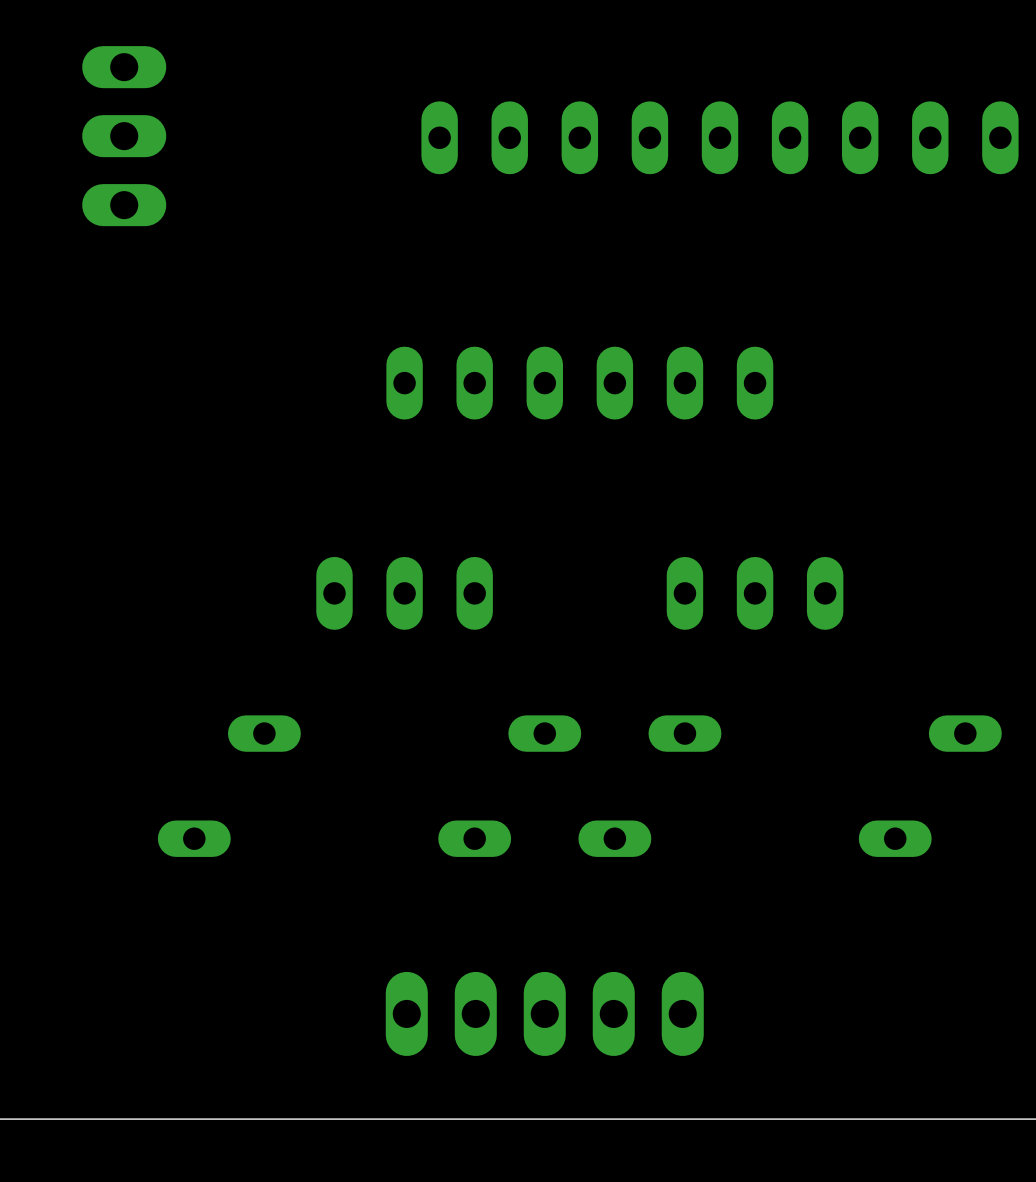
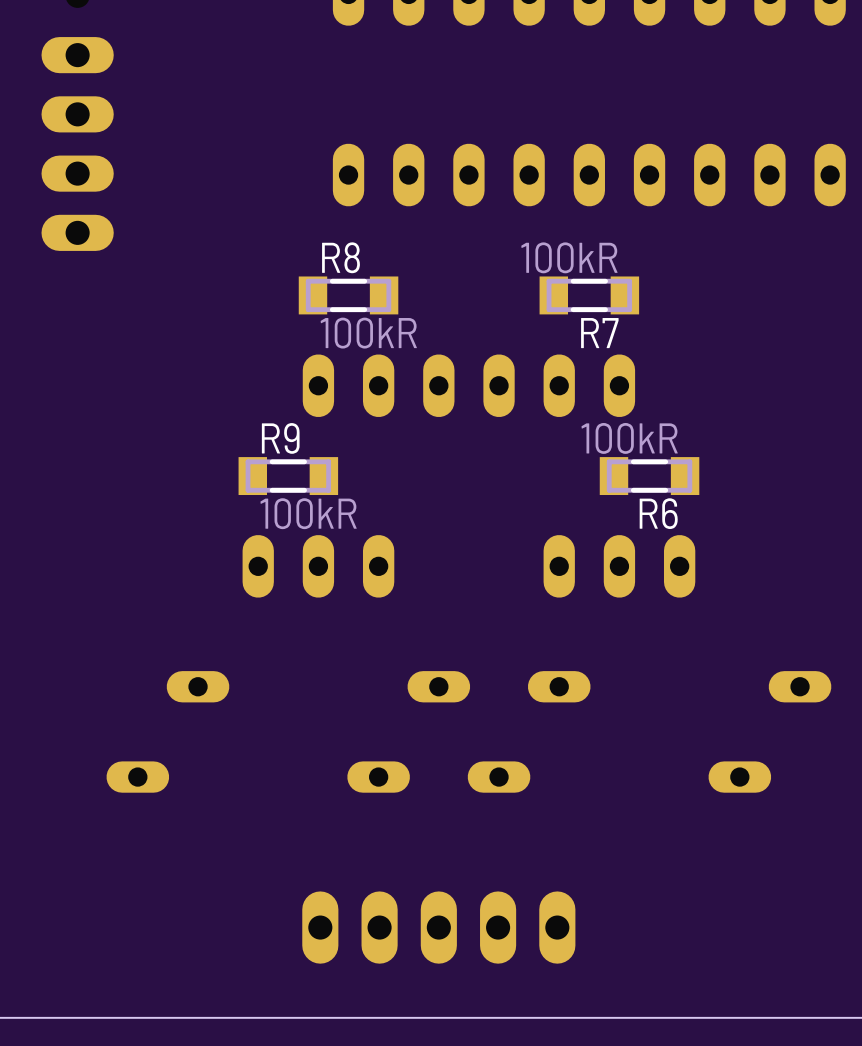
R8: none -> 100kR (348, 295)
R7: none -> 100kR (589, 295)
R9: none -> 100kR (288, 476)
R6: none -> 100kR (649, 476)

